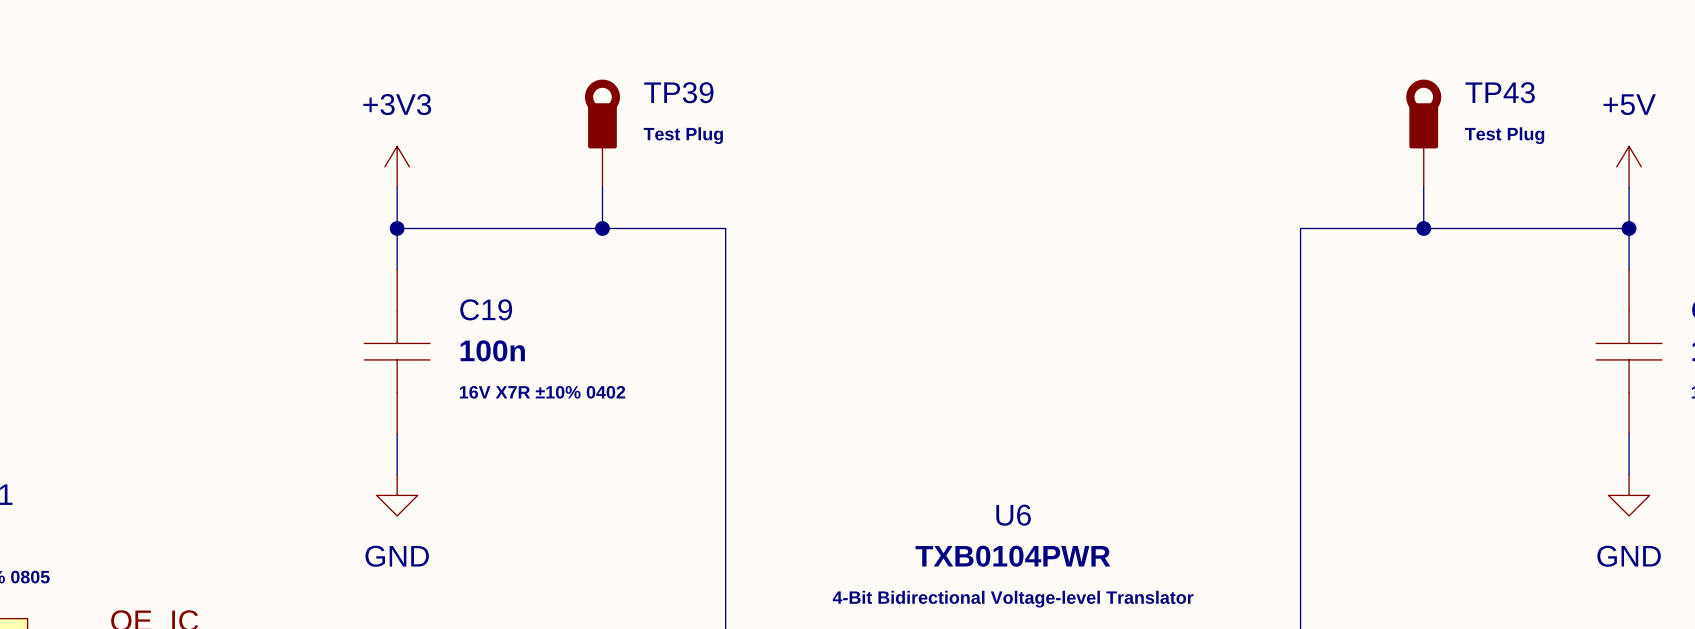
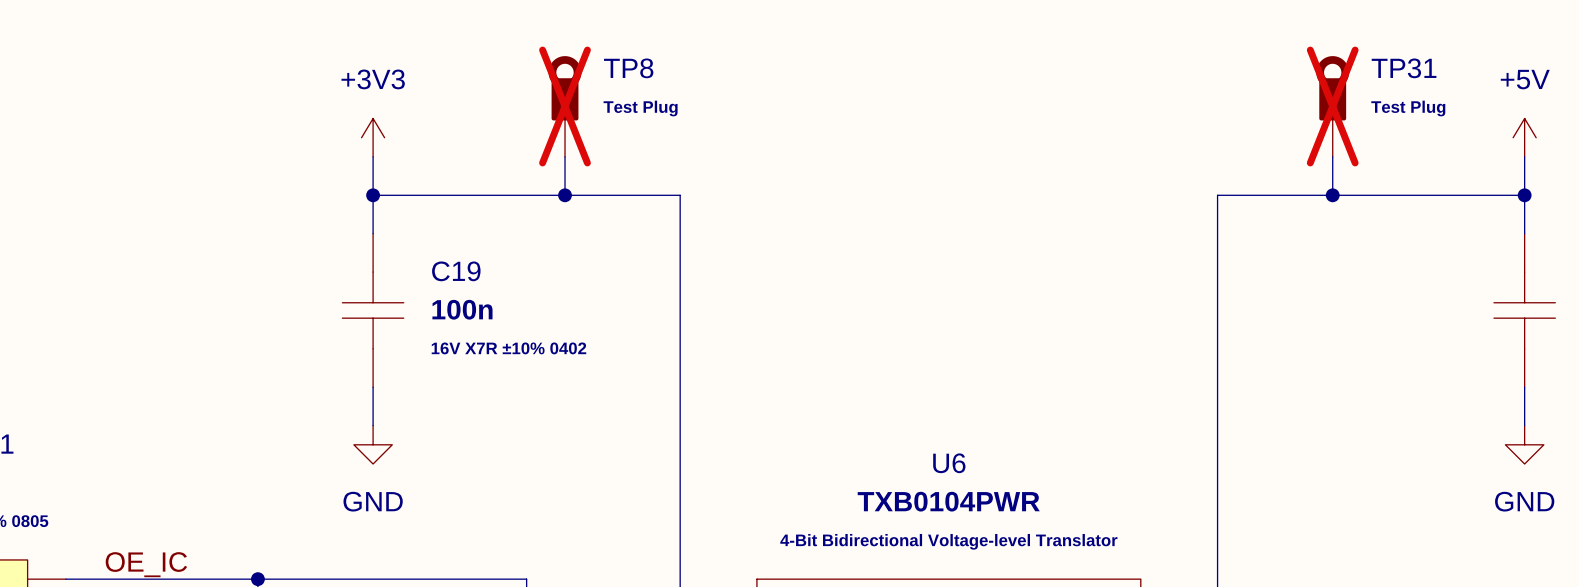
TP39 name: TP39 (678, 92) -> TP8 (628, 68)
TP43 name: TP43 (1500, 92) -> TP31 (1404, 68)
TP39 do-not-place cross: none -> (565, 106)
TP43 do-not-place cross: none -> (1332, 106)

